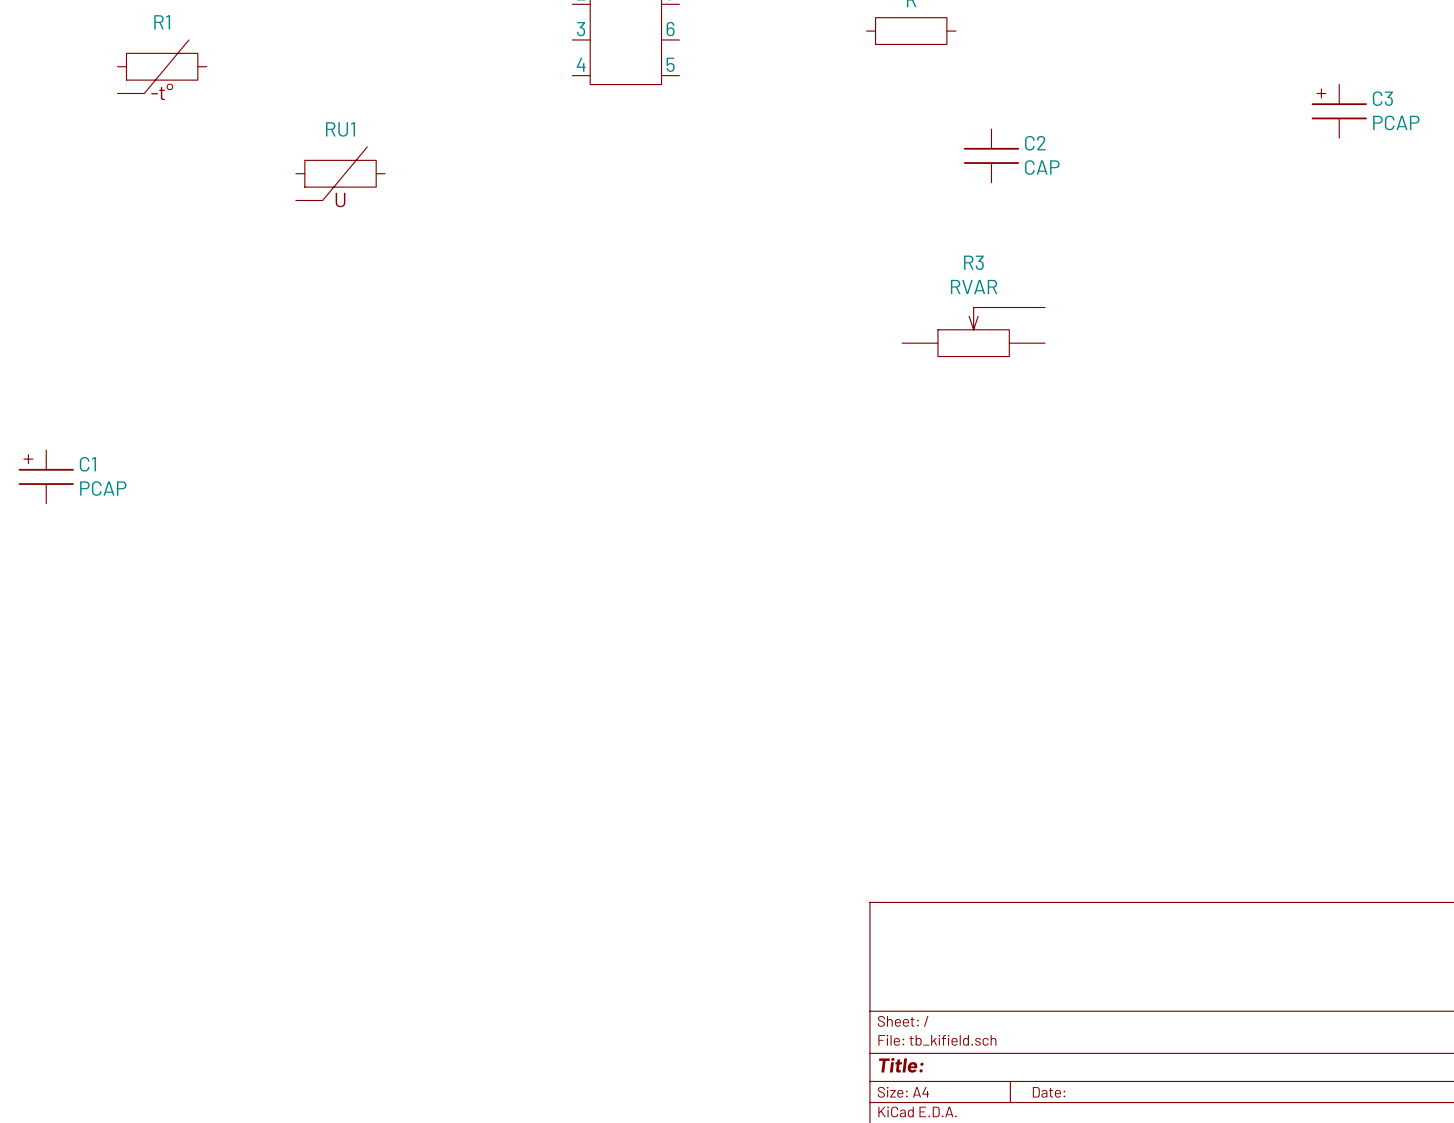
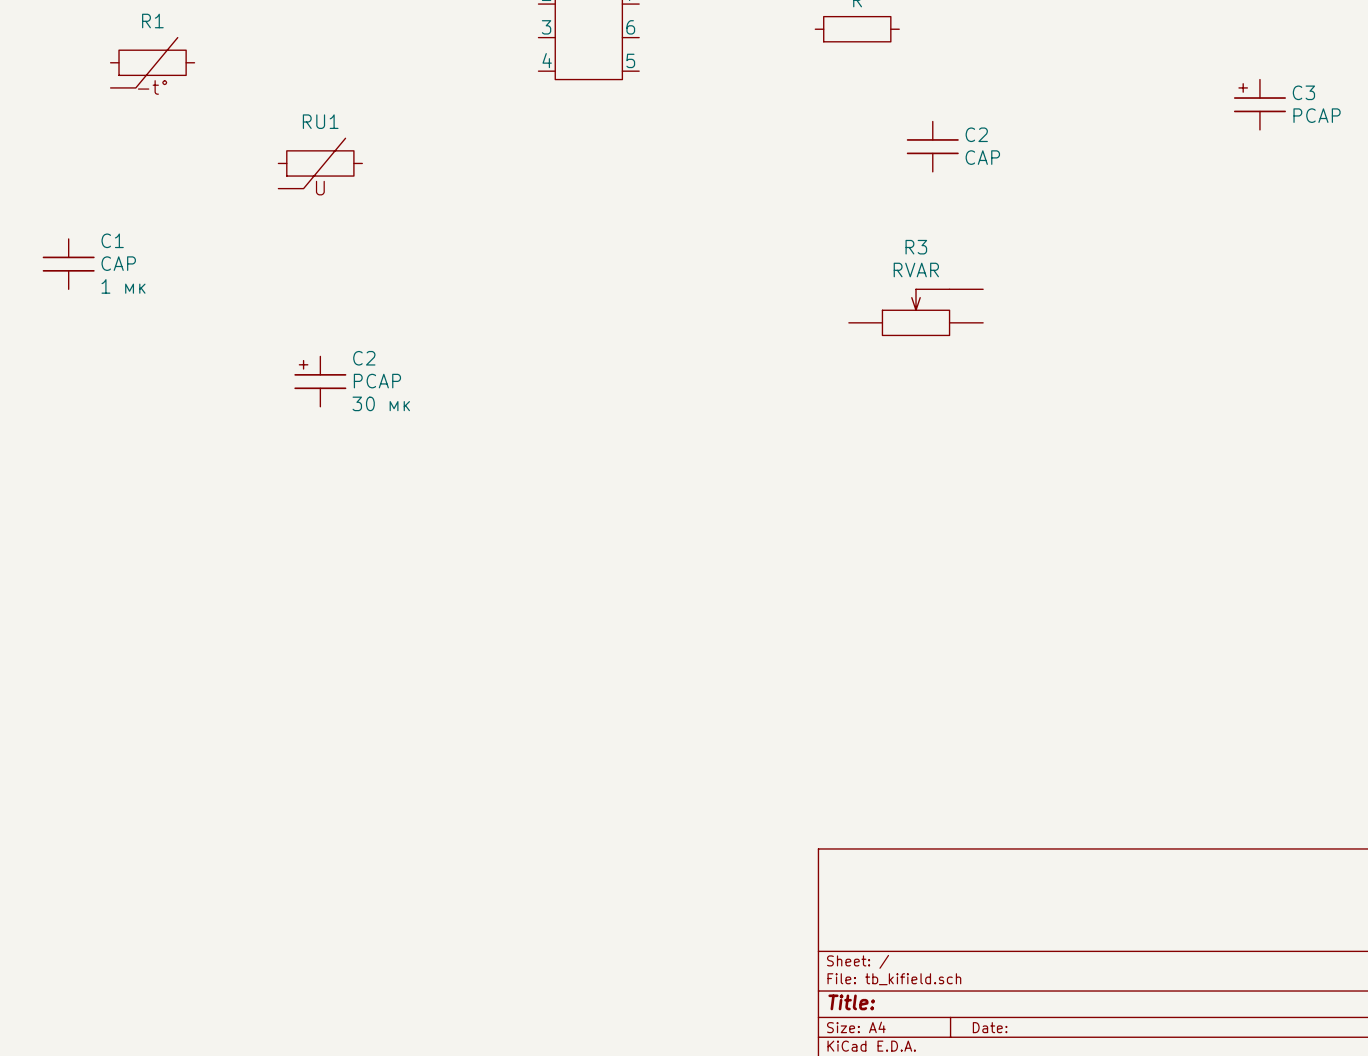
C1 text: none -> 1 мк (123, 286)
C2: none -> PCAP (320, 381)
C1 symbol: [18, 450, 74, 504] -> [42, 238, 95, 290]
C1 value: PCAP (103, 488) -> CAP (118, 263)

